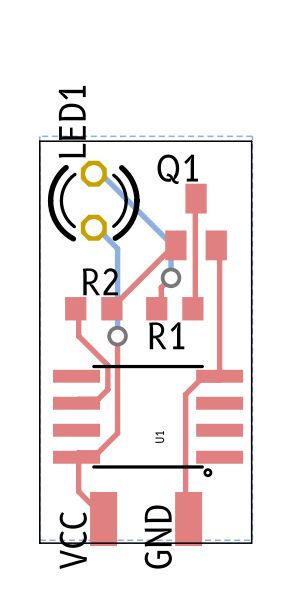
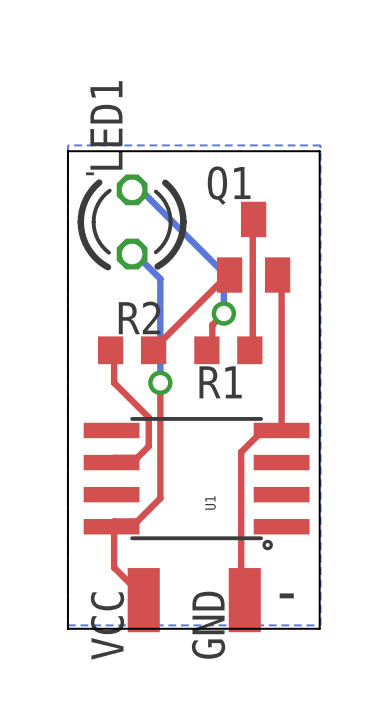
text: none -> - (89, 173)
text: none -> - (286, 595)

